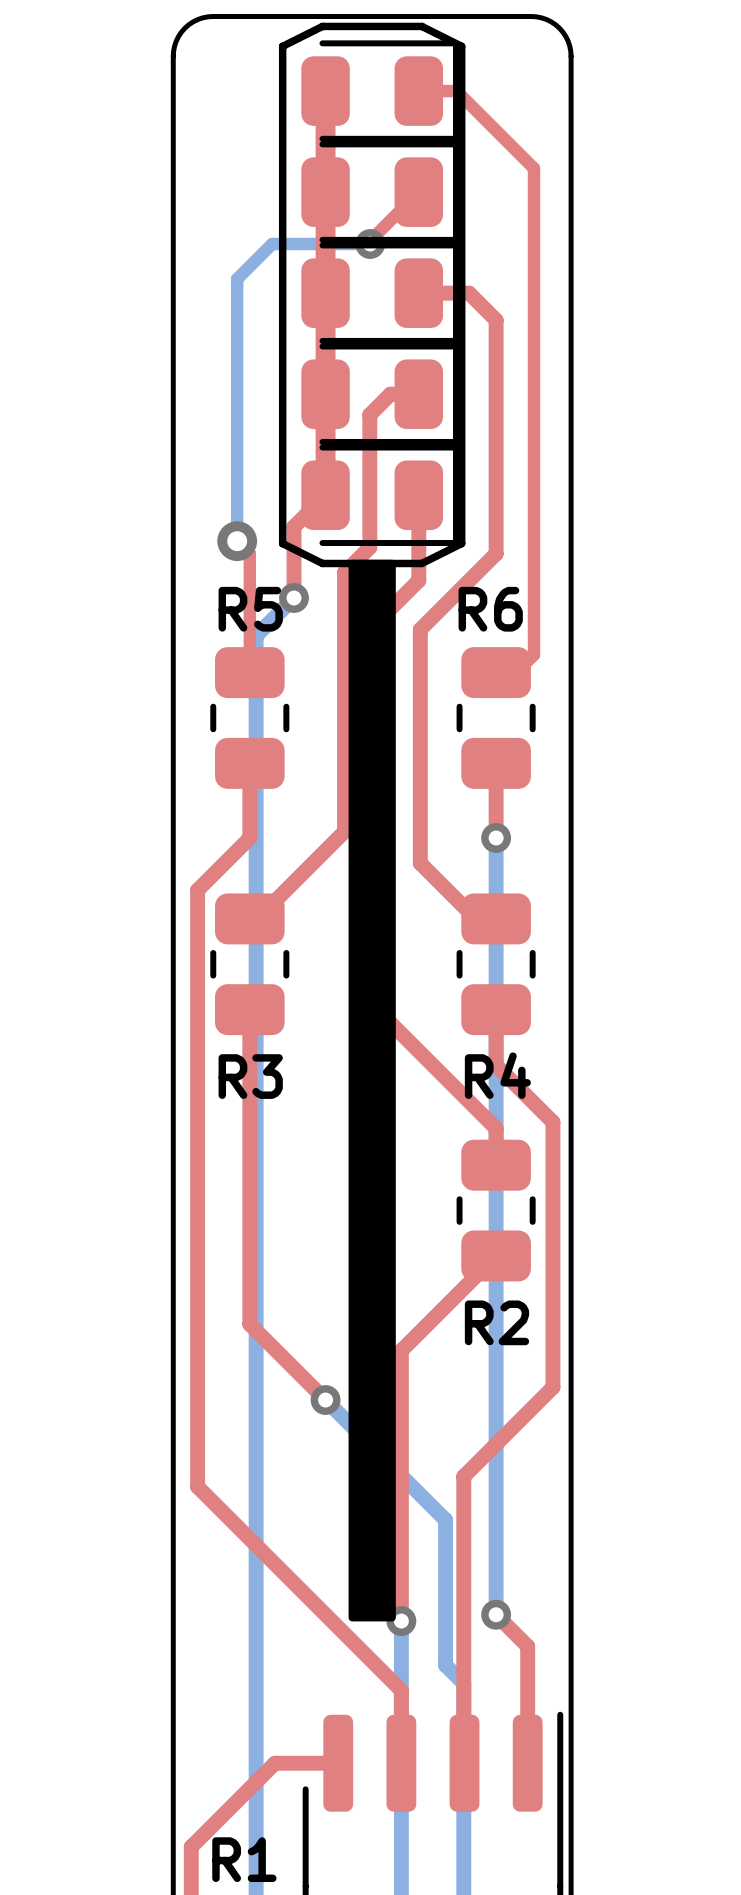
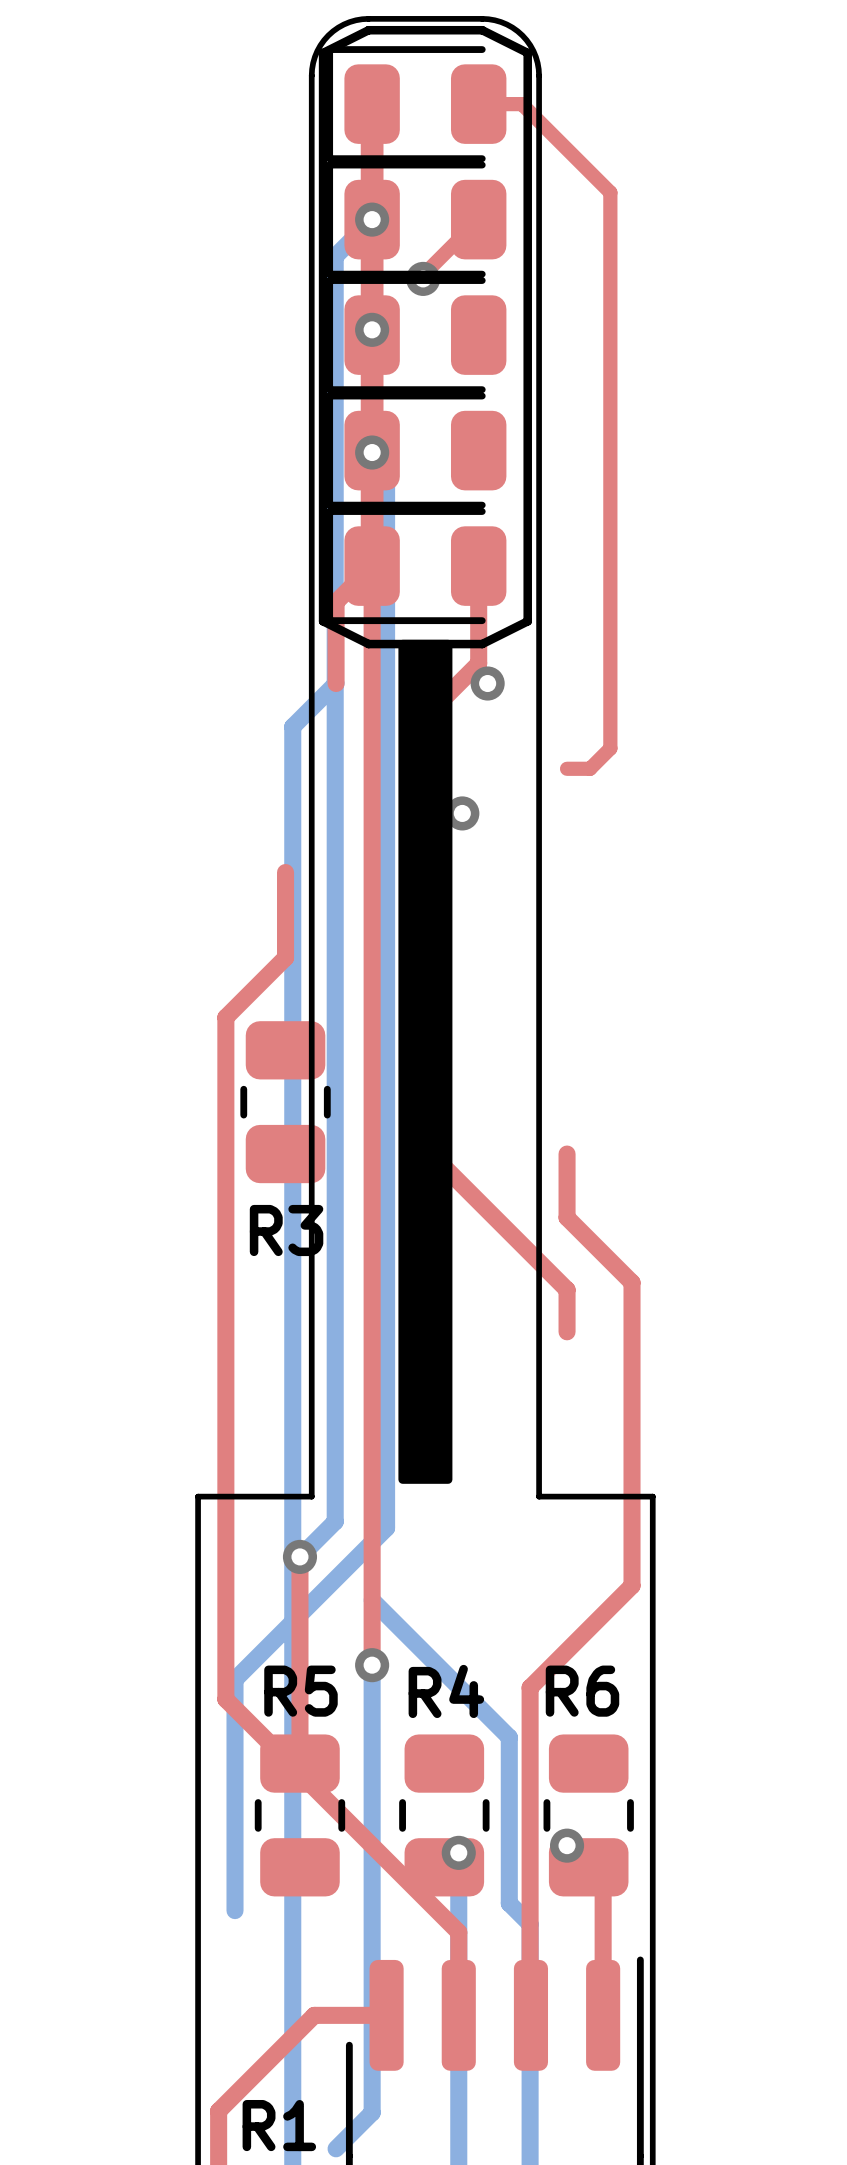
board edge: (322, 16) (202, 17) (184, 28) (176, 41) (173, 51) (173, 1309) -> (368, 18) (343, 24) (328, 35) (317, 51) (311, 75) (311, 1496) (198, 1496)
board edge: (421, 16) (541, 17) (551, 21) (562, 32) (570, 51) (571, 1309) -> (482, 18) (501, 22) (522, 35) (533, 51) (539, 75) (539, 1496) (652, 1496)
part rotation: 0° (380, 91) -> 180° (416, 104)
bottom track: none -> (372, 219) (335, 256) (335, 1521) (299, 1556)
via: none -> (372, 219)
part rotation: 0° (380, 192) -> 180° (416, 219)
bottom track: (370, 244) (272, 244) (237, 279) (237, 541) -> none
via: none -> (372, 329)
part rotation: 0° (380, 293) -> 180° (416, 335)
top track: (418, 293) (469, 293) (496, 320) (496, 553) (420, 629) (420, 863) (475, 918) (496, 918) -> none
part rotation: 0° (380, 394) -> 180° (416, 450)
top track: (418, 394) (390, 394) (369, 414) (369, 547) (344, 572) (344, 831) (257, 918) (249, 918) -> none
bottom track: none -> (372, 452) (386, 466) (386, 1528) (235, 1679) (235, 1910)
via: none -> (372, 452)
top track: none -> (372, 566) (372, 1665)
part rotation: 0° (380, 495) -> 180° (416, 566)
top track: (237, 541) (249, 553) (249, 672) -> none
via: (237, 541) -> none
drawing: [348, 559, 396, 1622] -> none
drawing: none -> [398, 639, 453, 1484]
via: (294, 598) -> none
via: none -> (487, 683)
via: none -> (462, 813)
R5 position: (249, 717) -> (299, 1815)
R6 position: (496, 717) -> (588, 1815)
top track: (496, 763) (496, 837) -> none
bottom track: (496, 837) (496, 1614) -> none
via: (496, 837) -> none
R4 position: (496, 964) -> (444, 1815)
top track: (249, 1009) (249, 1324) (325, 1400) -> none
R4 name position: R4 (497, 1075) -> R4 (446, 1691)
R2: (496, 1210) -> none
top track: (496, 1255) (401, 1350) (401, 1621) -> none
top track: none -> (299, 1556) (299, 1763)
via: none -> (299, 1556)
via: (325, 1400) -> none
bottom track: none -> (372, 1665) (372, 2112) (336, 2148)
via: none -> (372, 1665)

